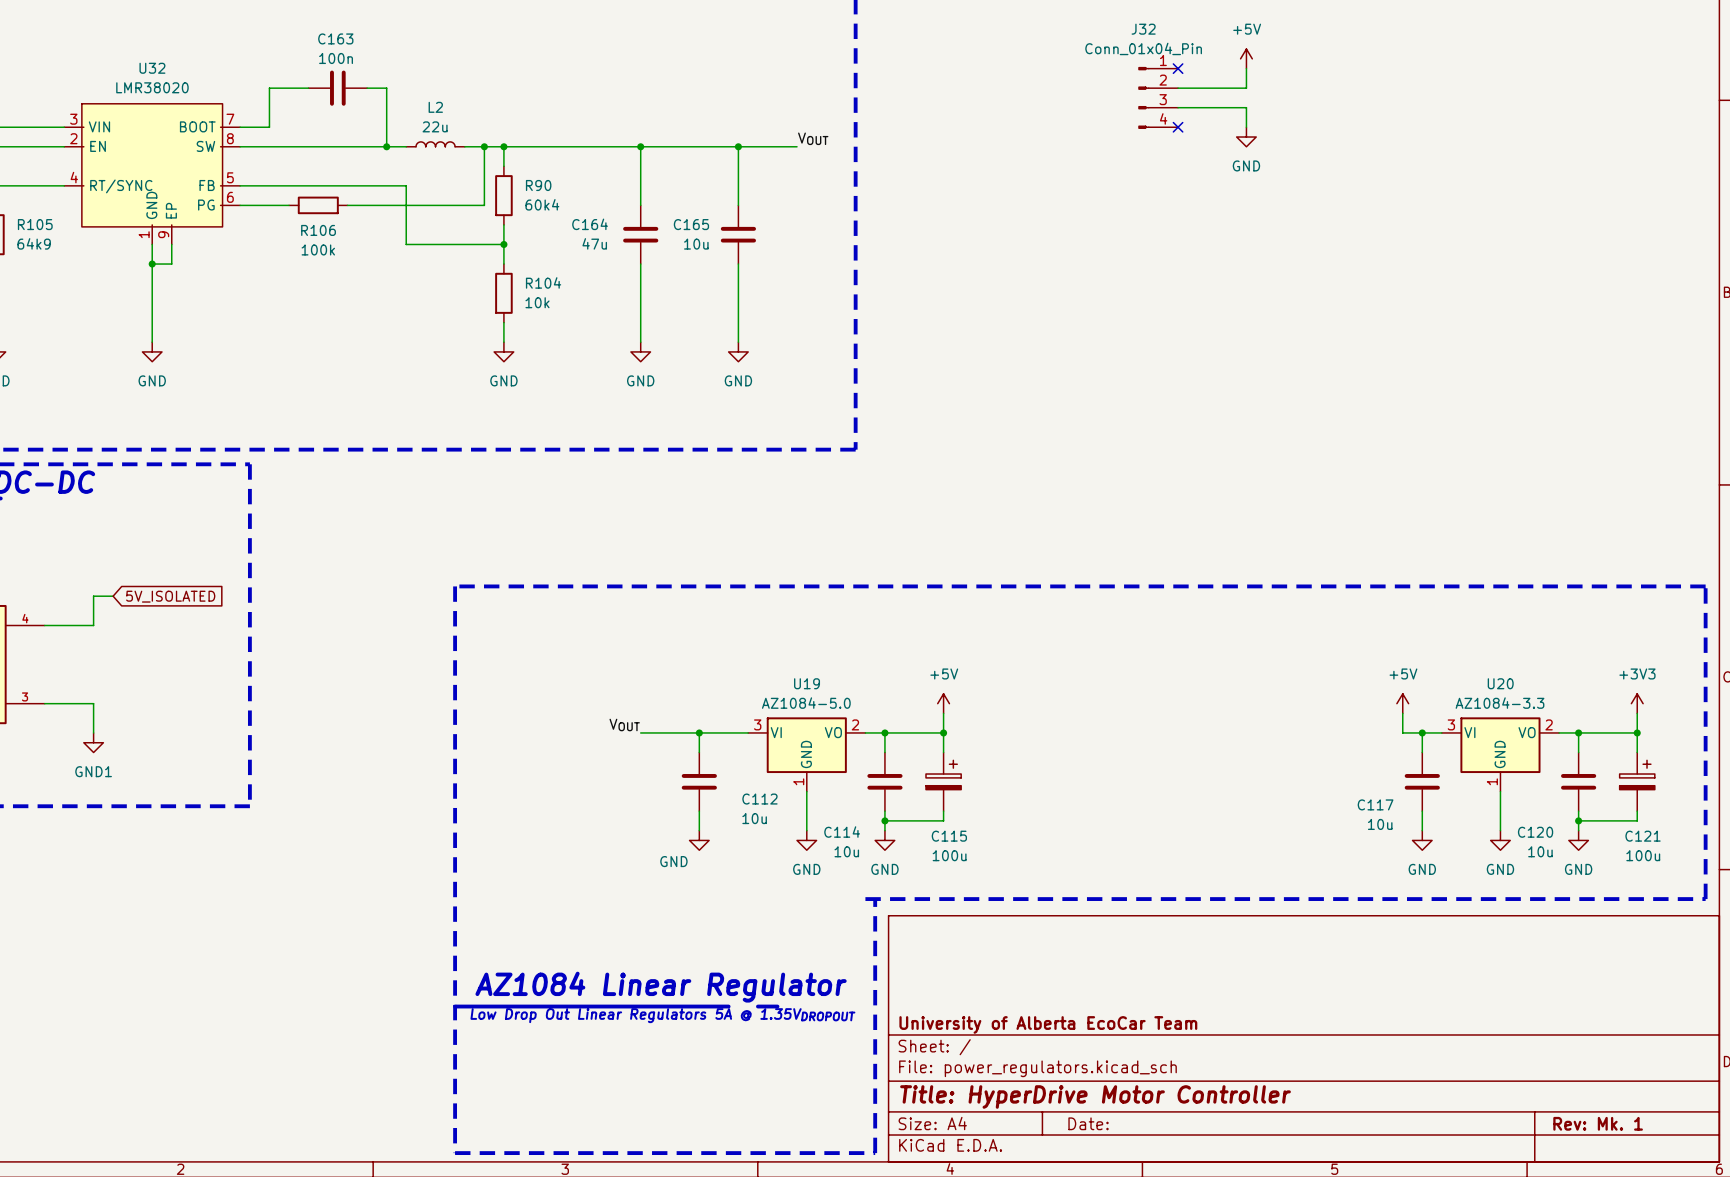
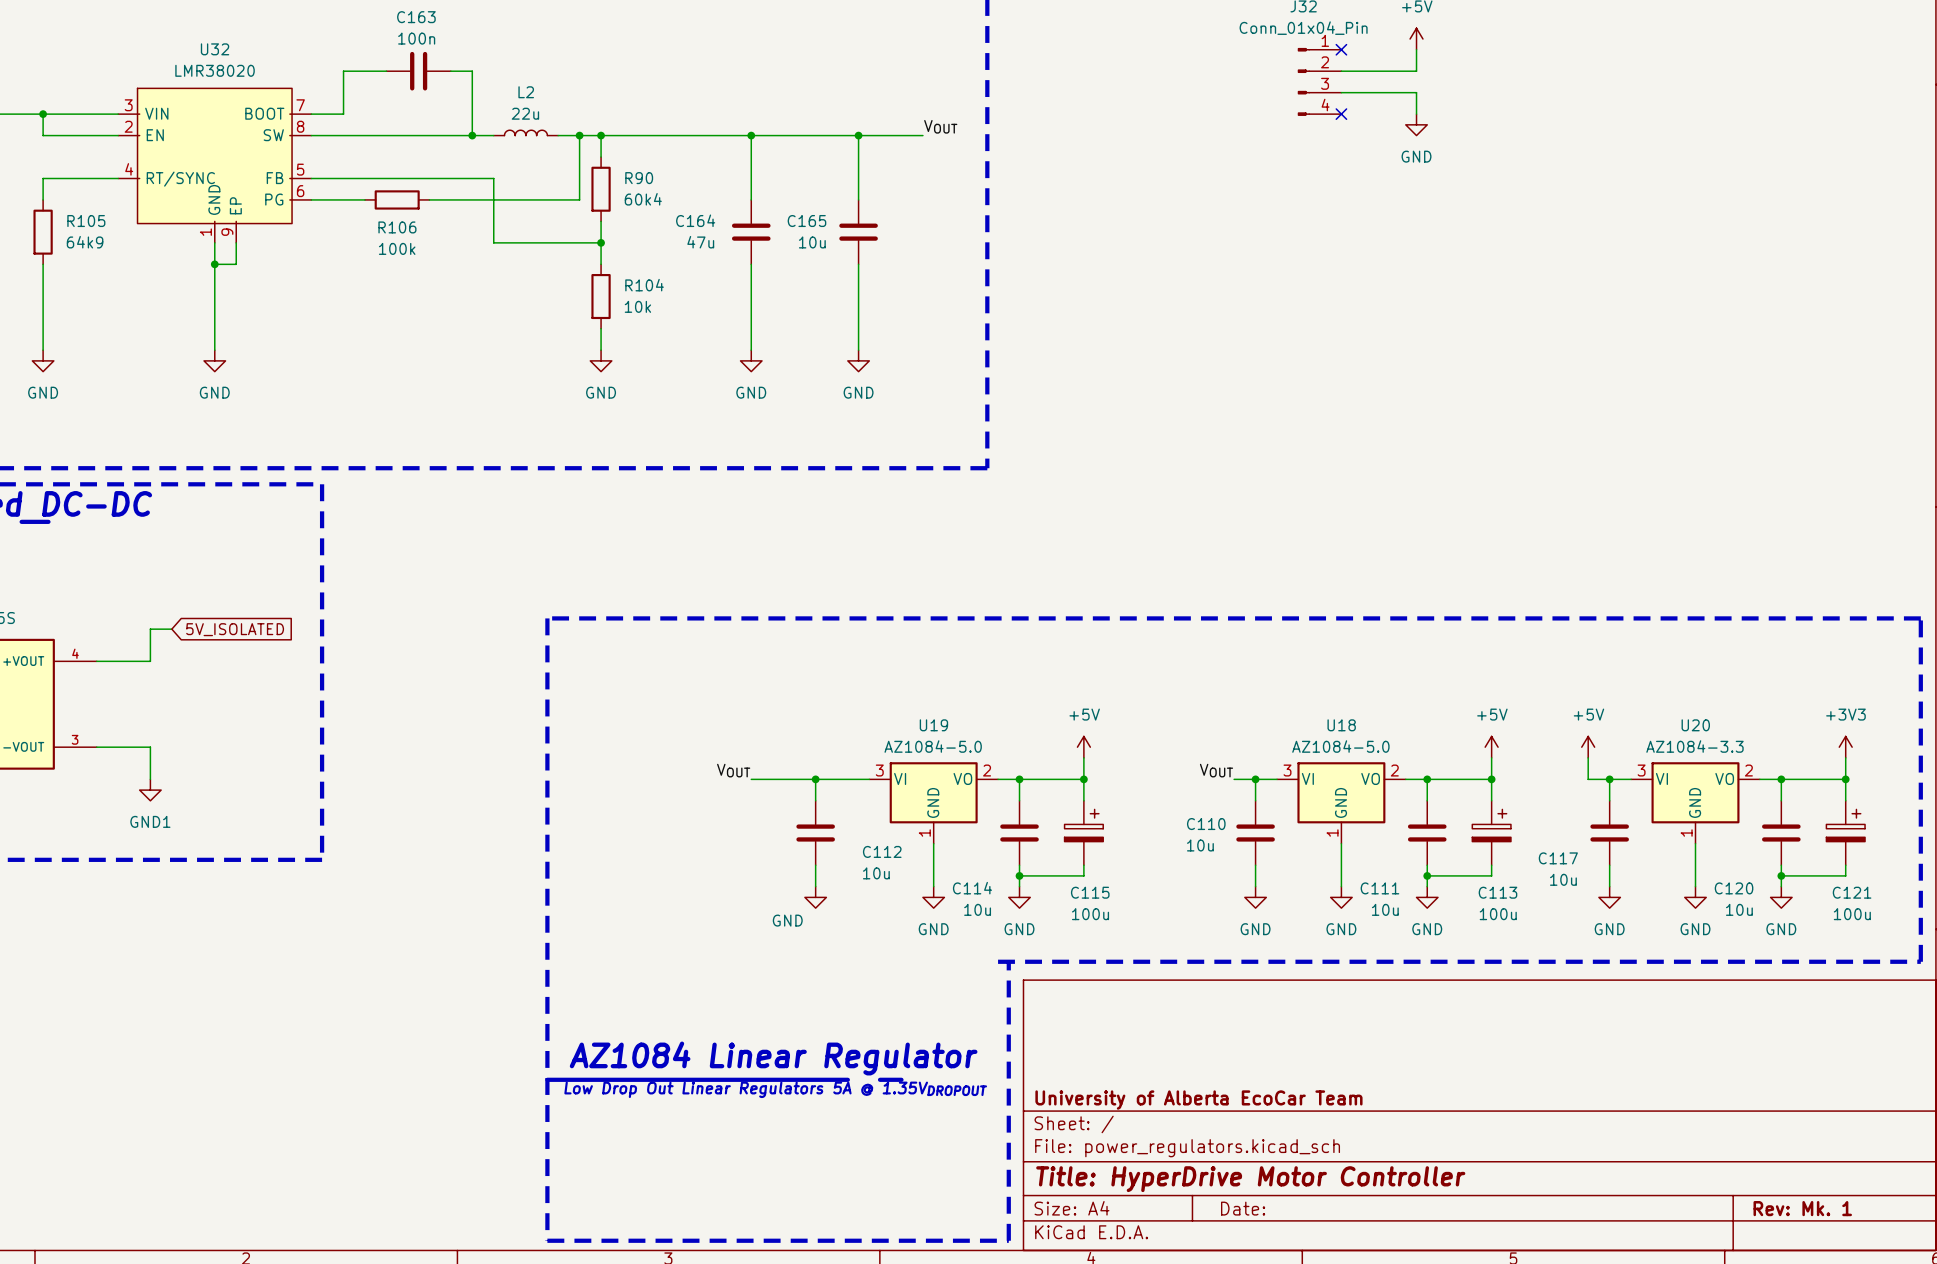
power symbol: none -> +5V (1491, 747)
wire: none -> (1491, 757) (1491, 800)
label: none -> VOUT (1216, 770)
wire: none -> (1234, 779) (1277, 779)
wire: none -> (1255, 779) (1255, 800)
junction: none -> (1255, 779)
wire: none -> (1405, 779) (1491, 779)
wire: none -> (1427, 779) (1427, 800)
junction: none -> (1427, 779)
junction: none -> (1491, 779)
U18: none -> AZ1084-5.0 (1341, 802)
C110: none -> 10u (1255, 833)
C111: none -> 10u (1427, 833)
C113: none -> 100u (1491, 833)
wire: none -> (1341, 843) (1341, 886)
wire: none -> (1255, 865) (1255, 886)
wire: none -> (1427, 865) (1427, 886)
wire: none -> (1491, 865) (1491, 875) (1427, 875)
junction: none -> (1427, 875)
power symbol: none -> GND (1255, 897)
power symbol: none -> GND (1341, 897)
power symbol: none -> GND (1427, 897)

